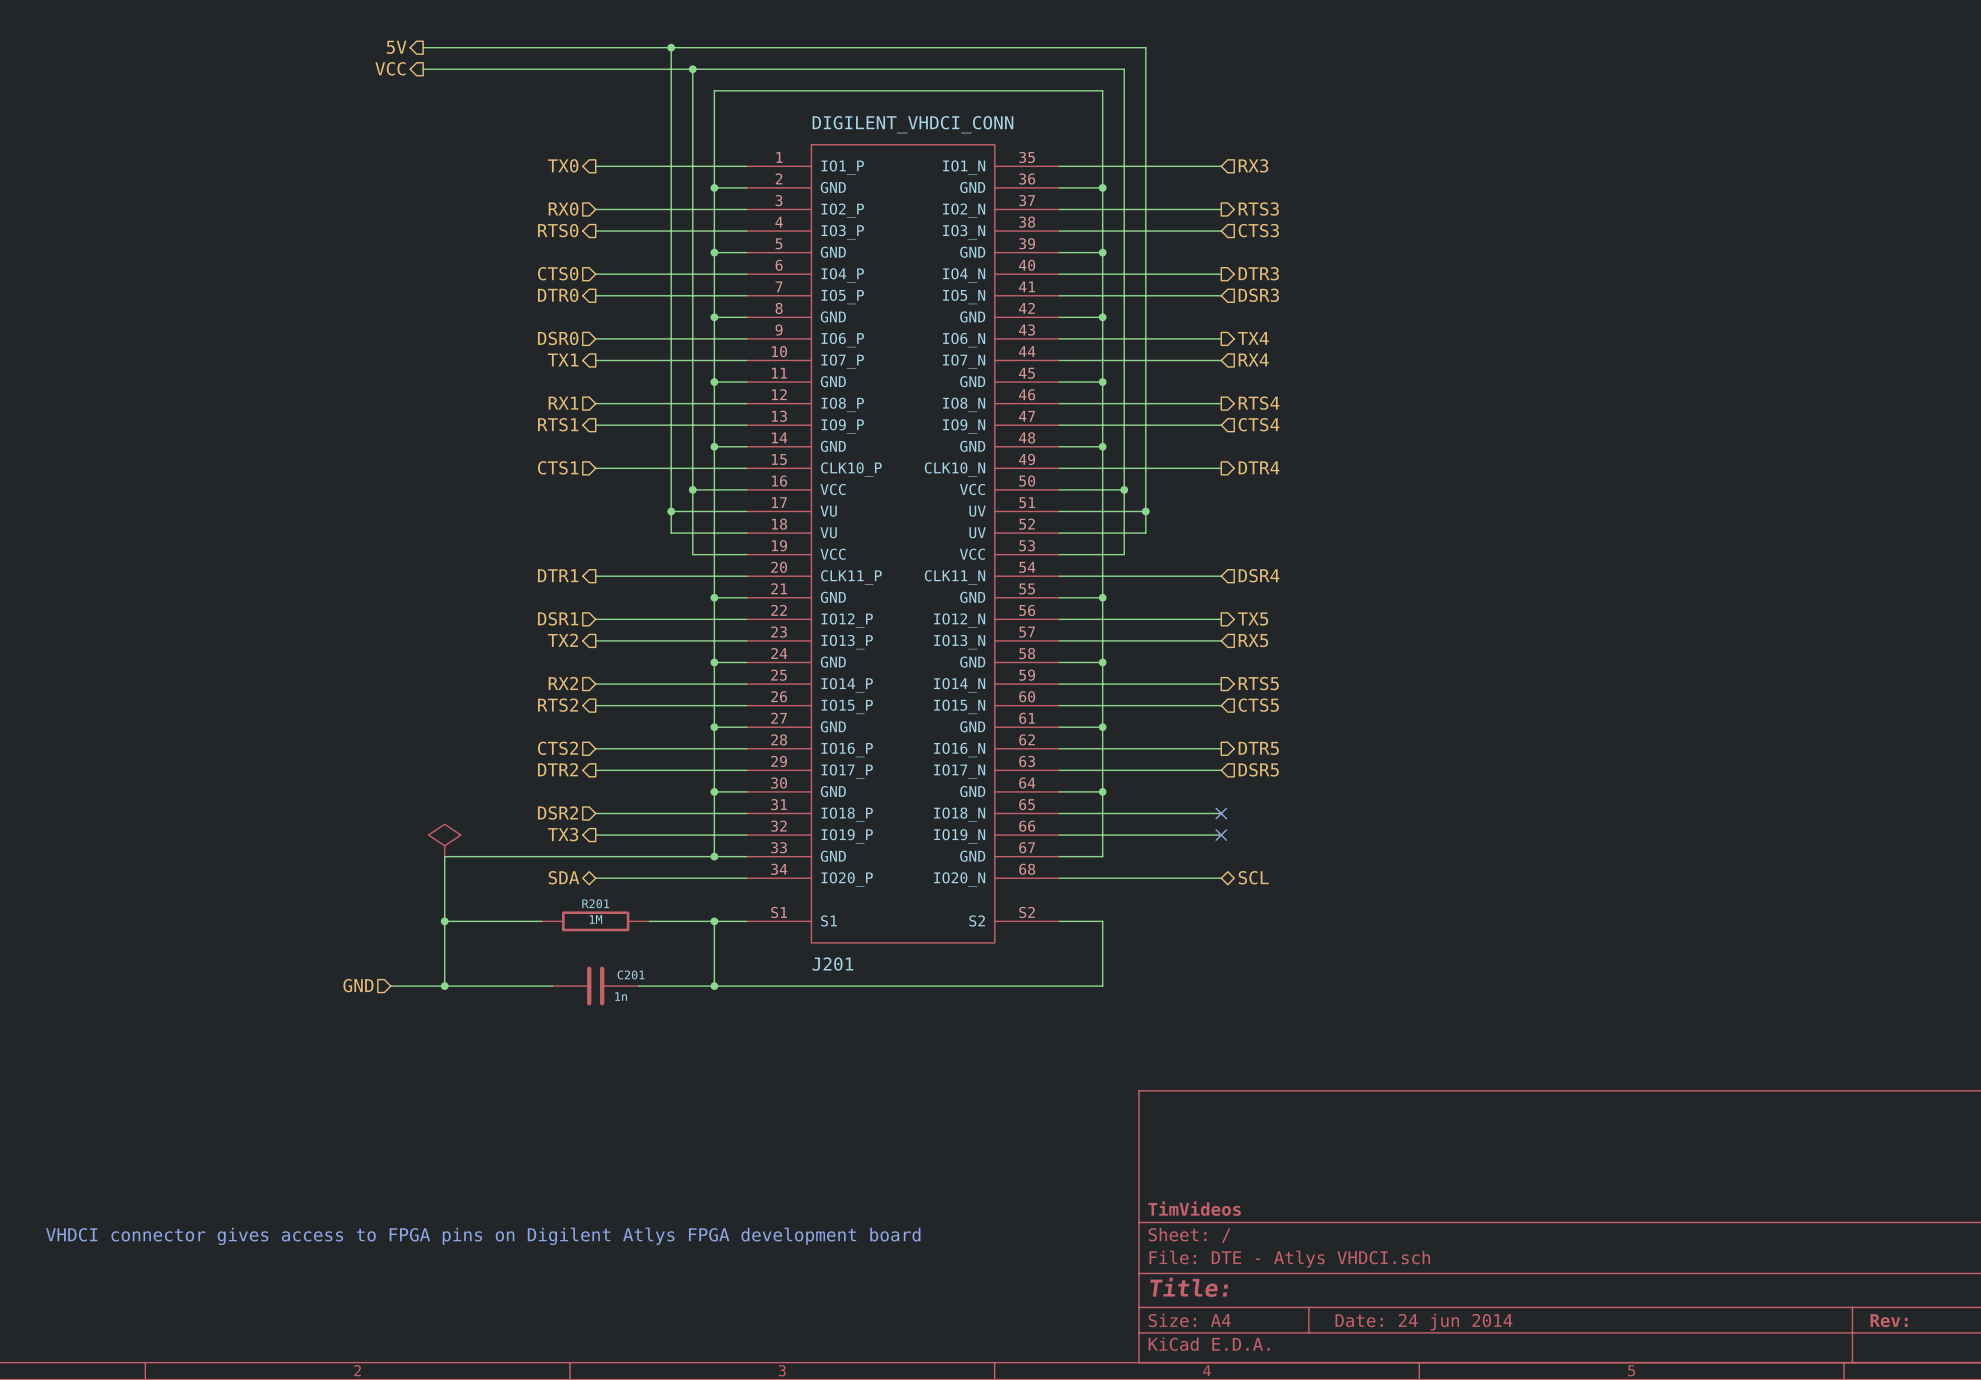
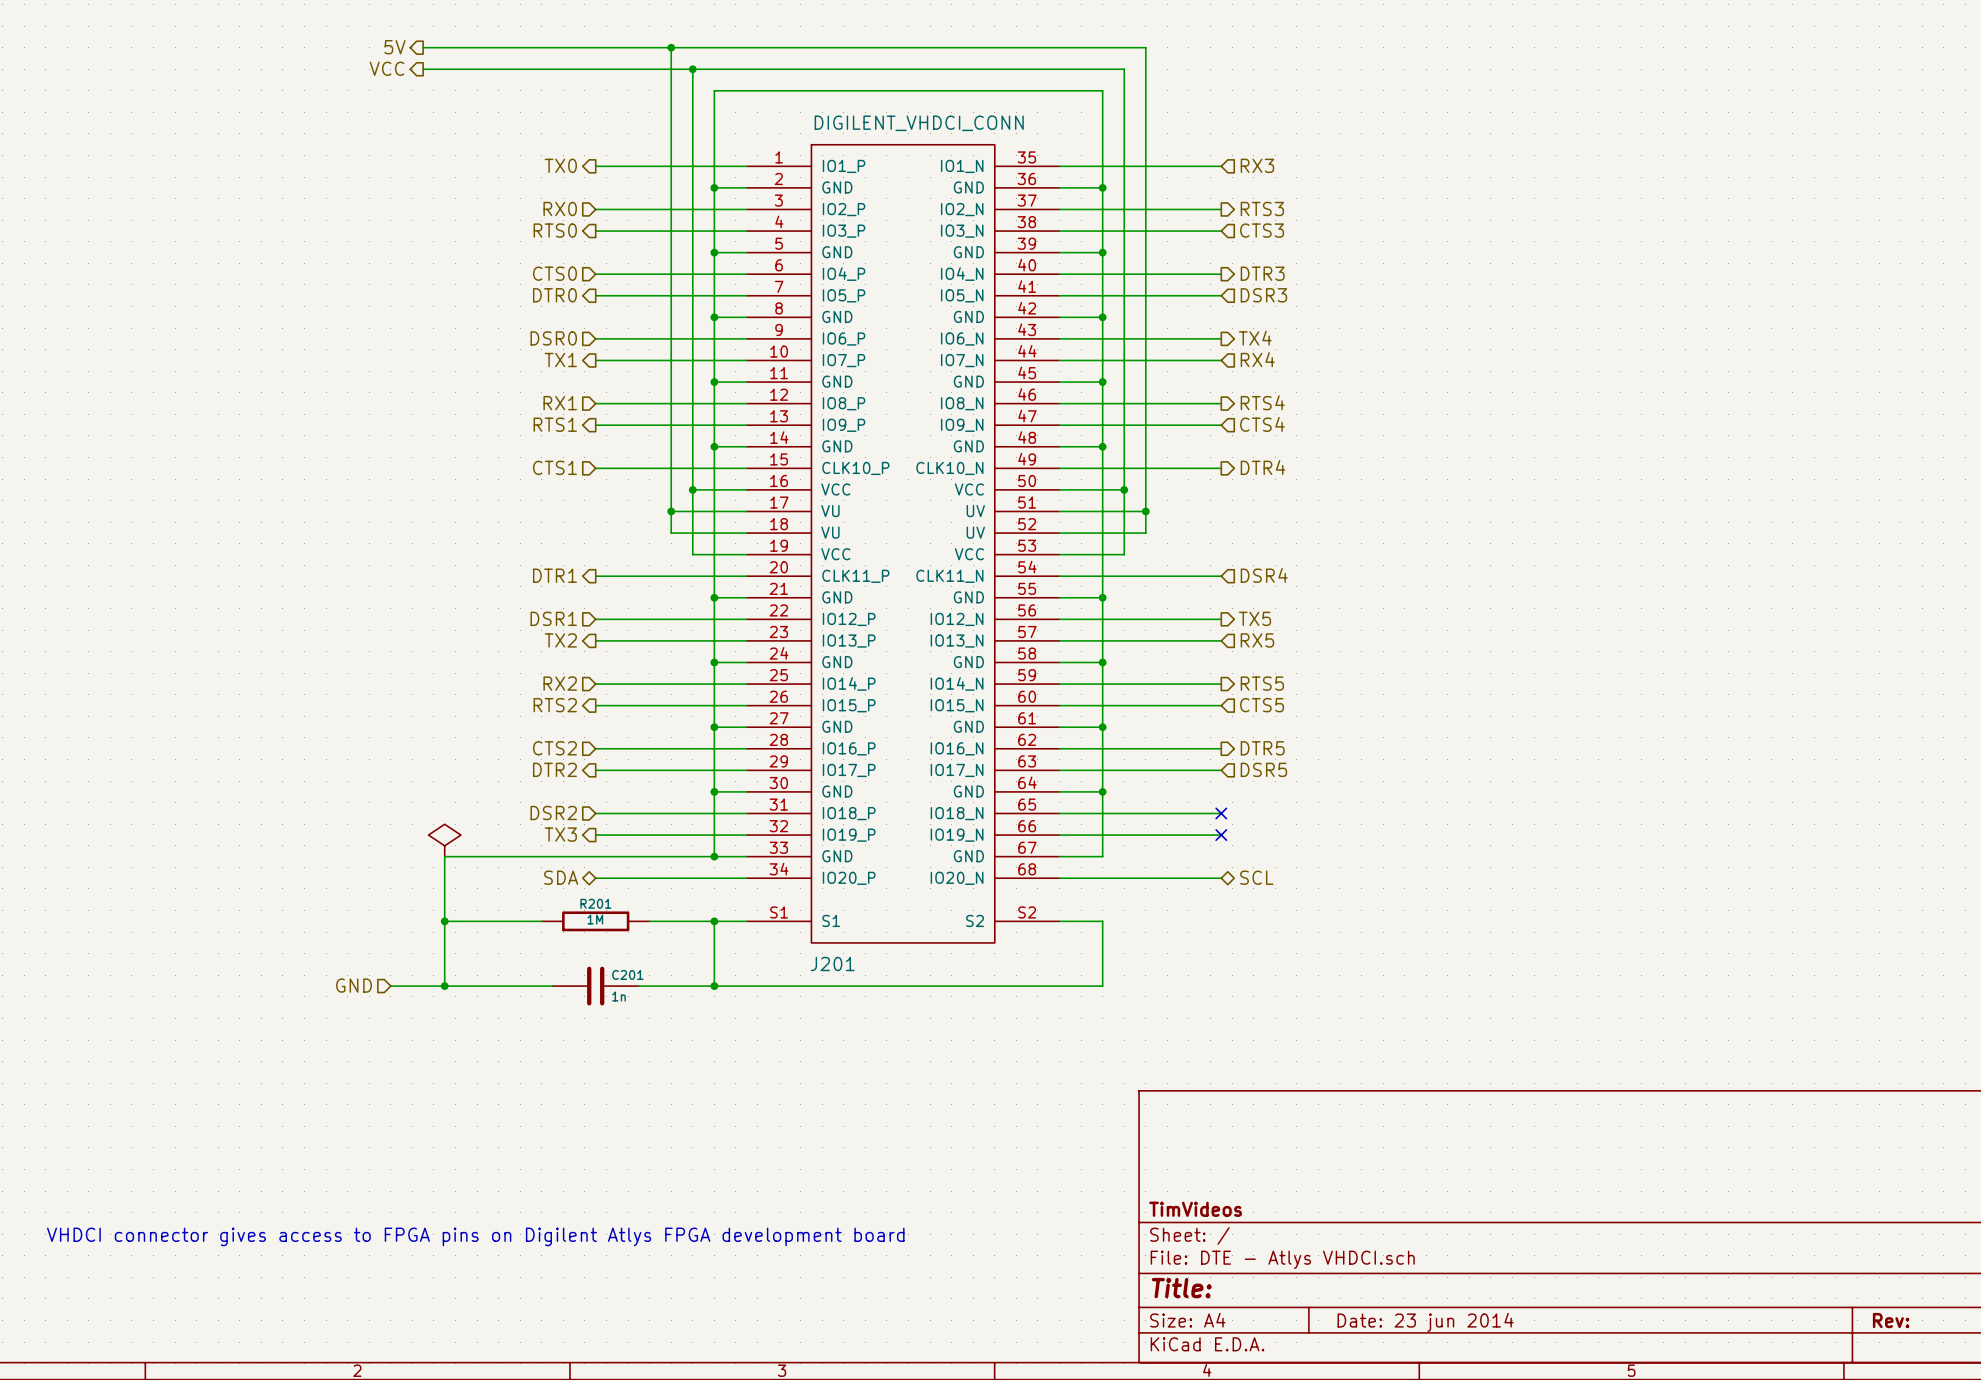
title block: Date: 24 jun 2014 (1423, 1322) -> Date: 23 jun 2014 (1425, 1322)

